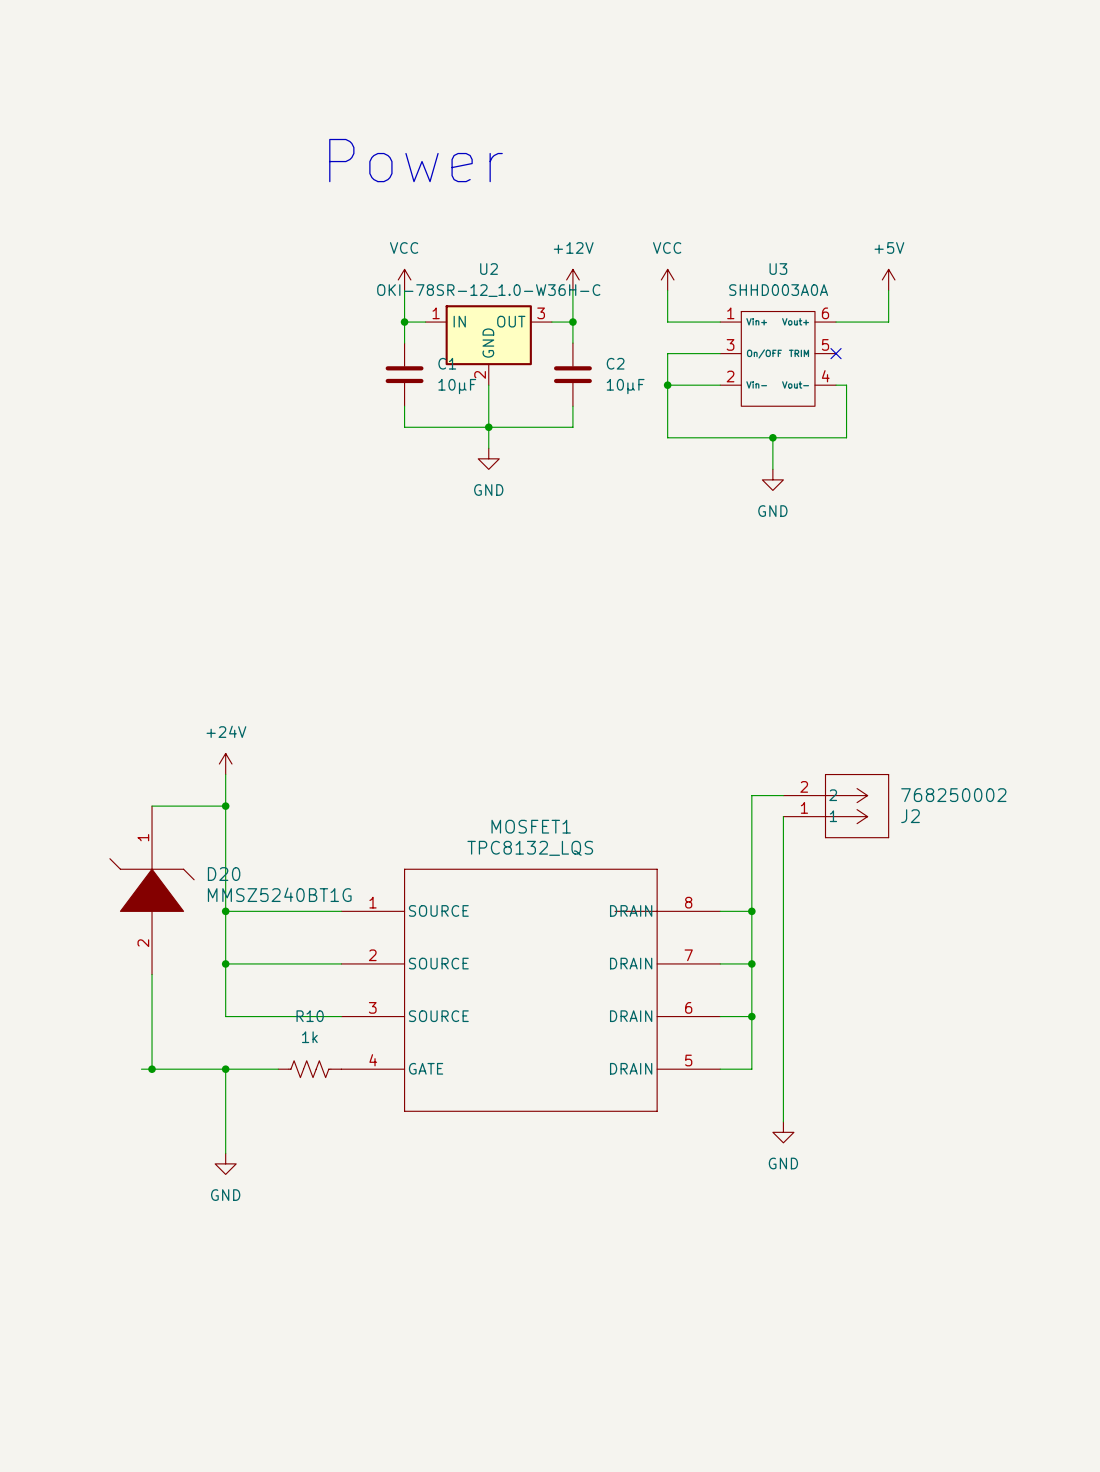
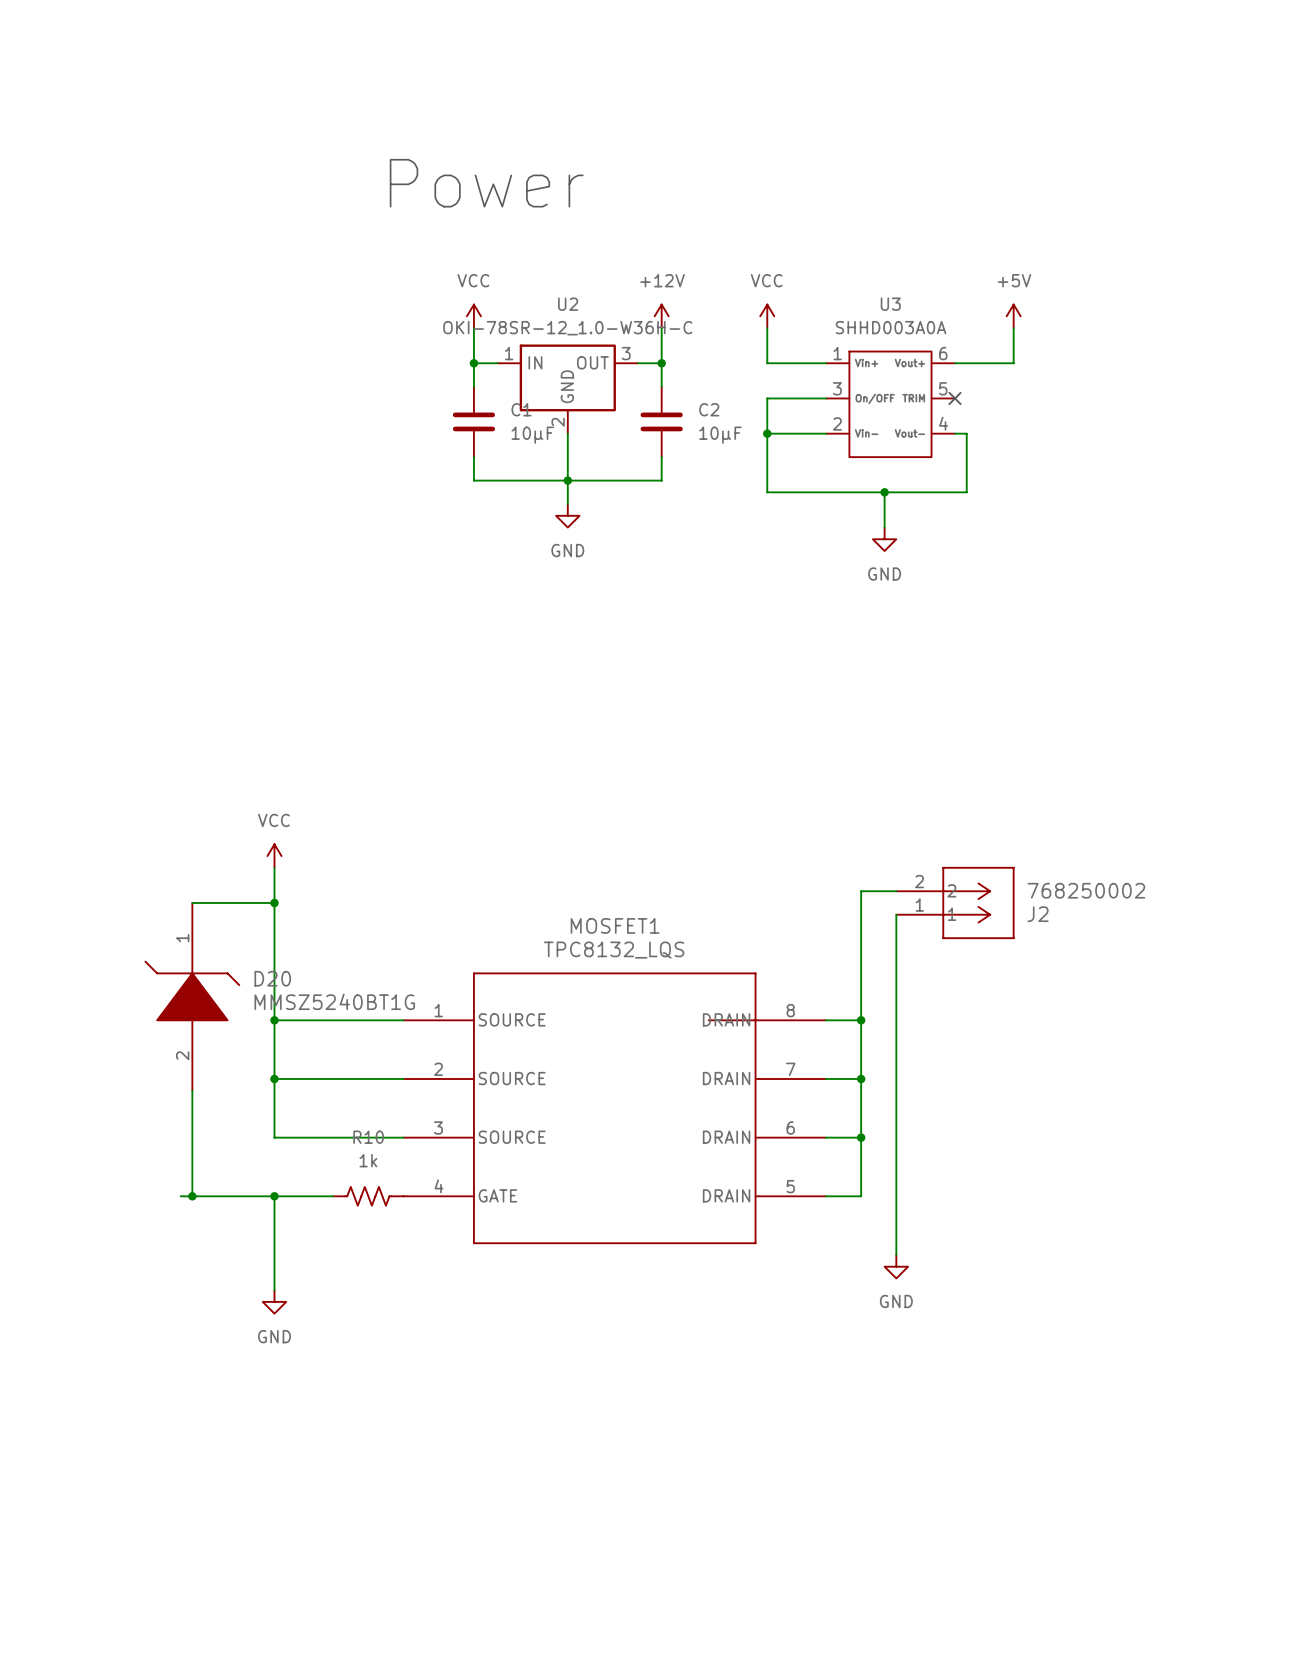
power symbol: +24V (225, 764) -> VCC (274, 856)

